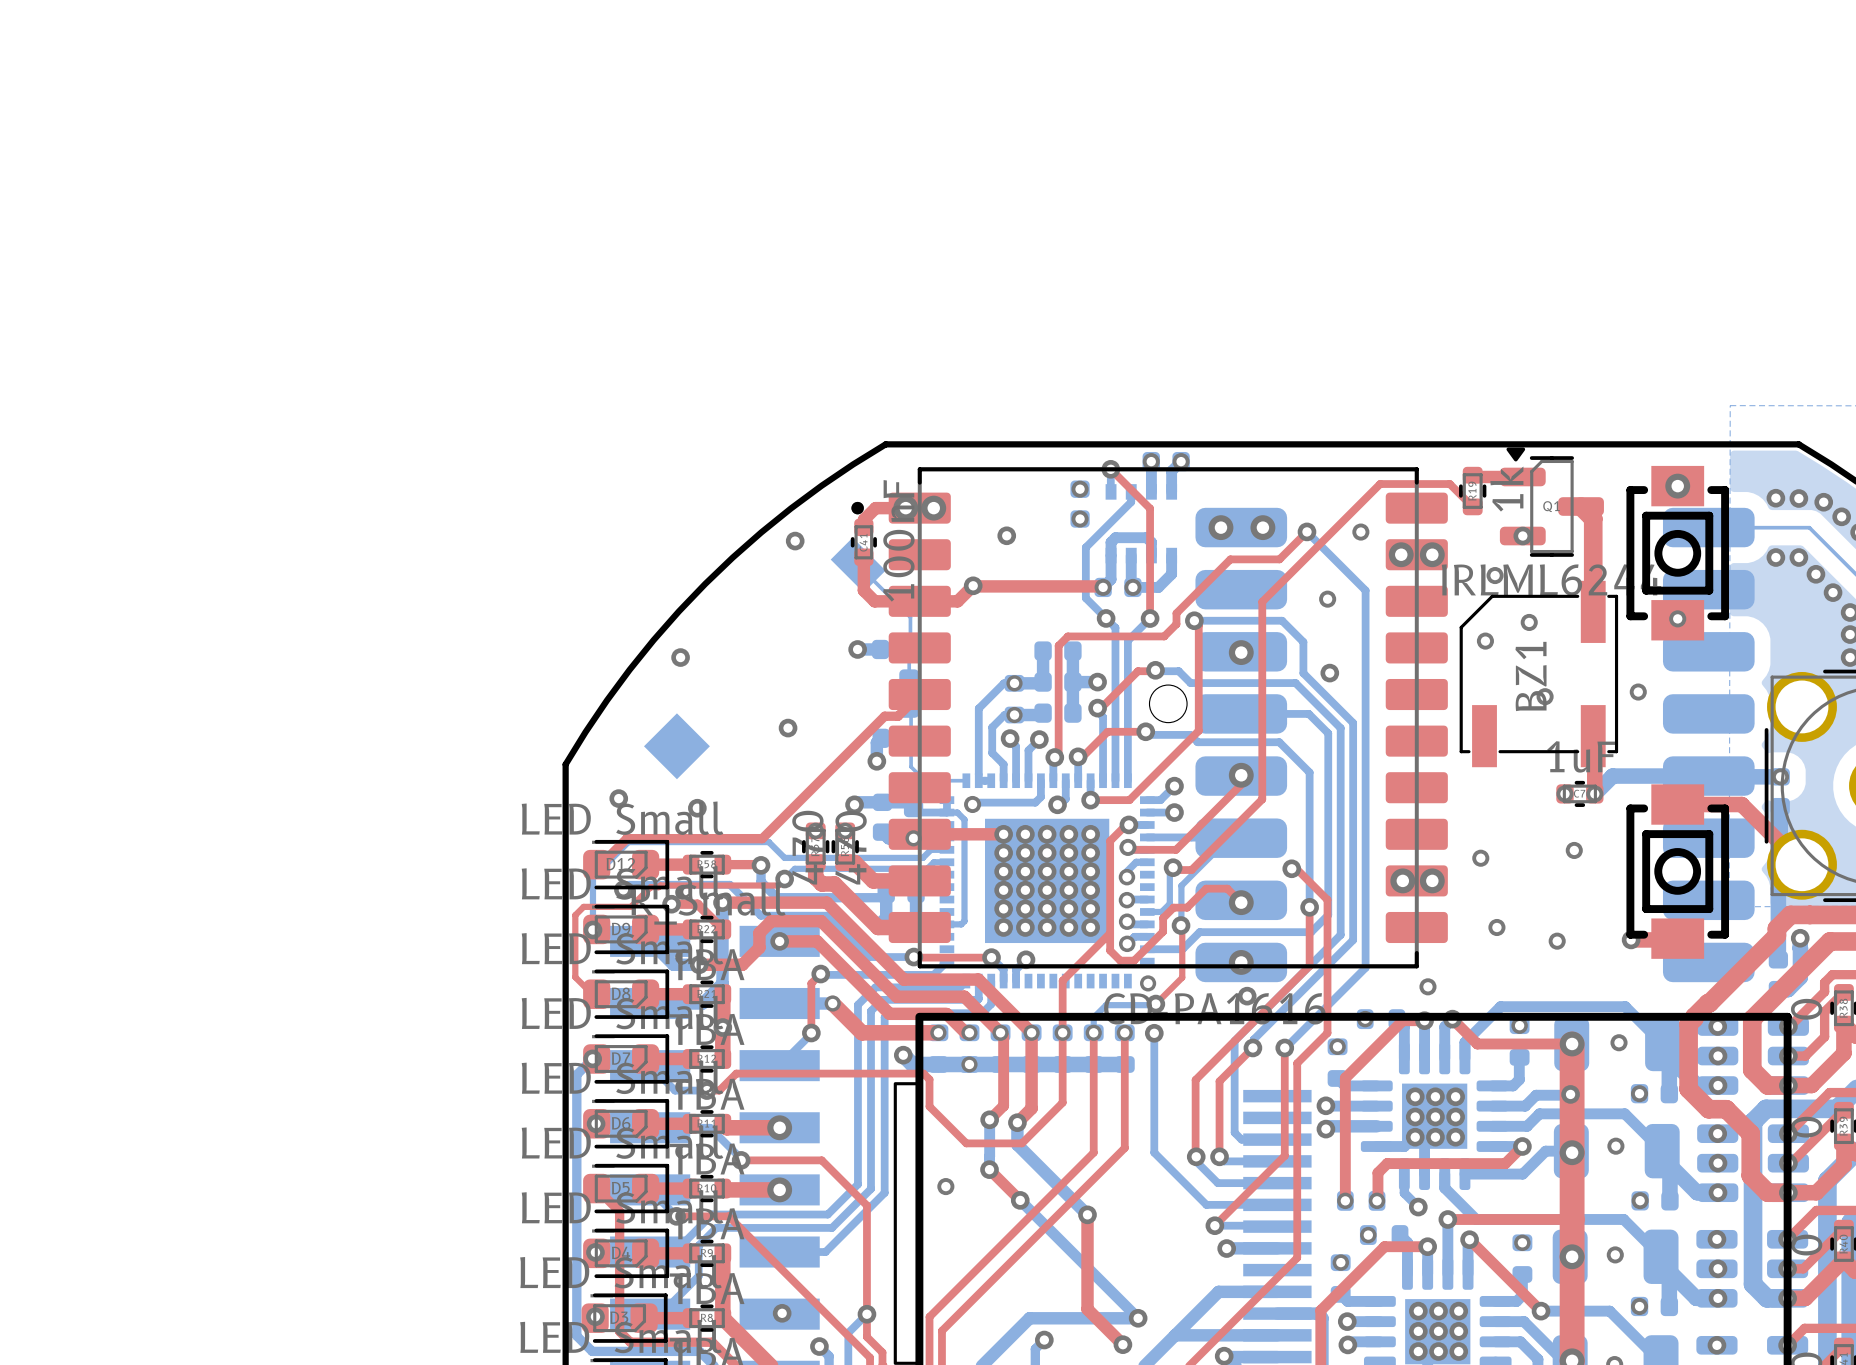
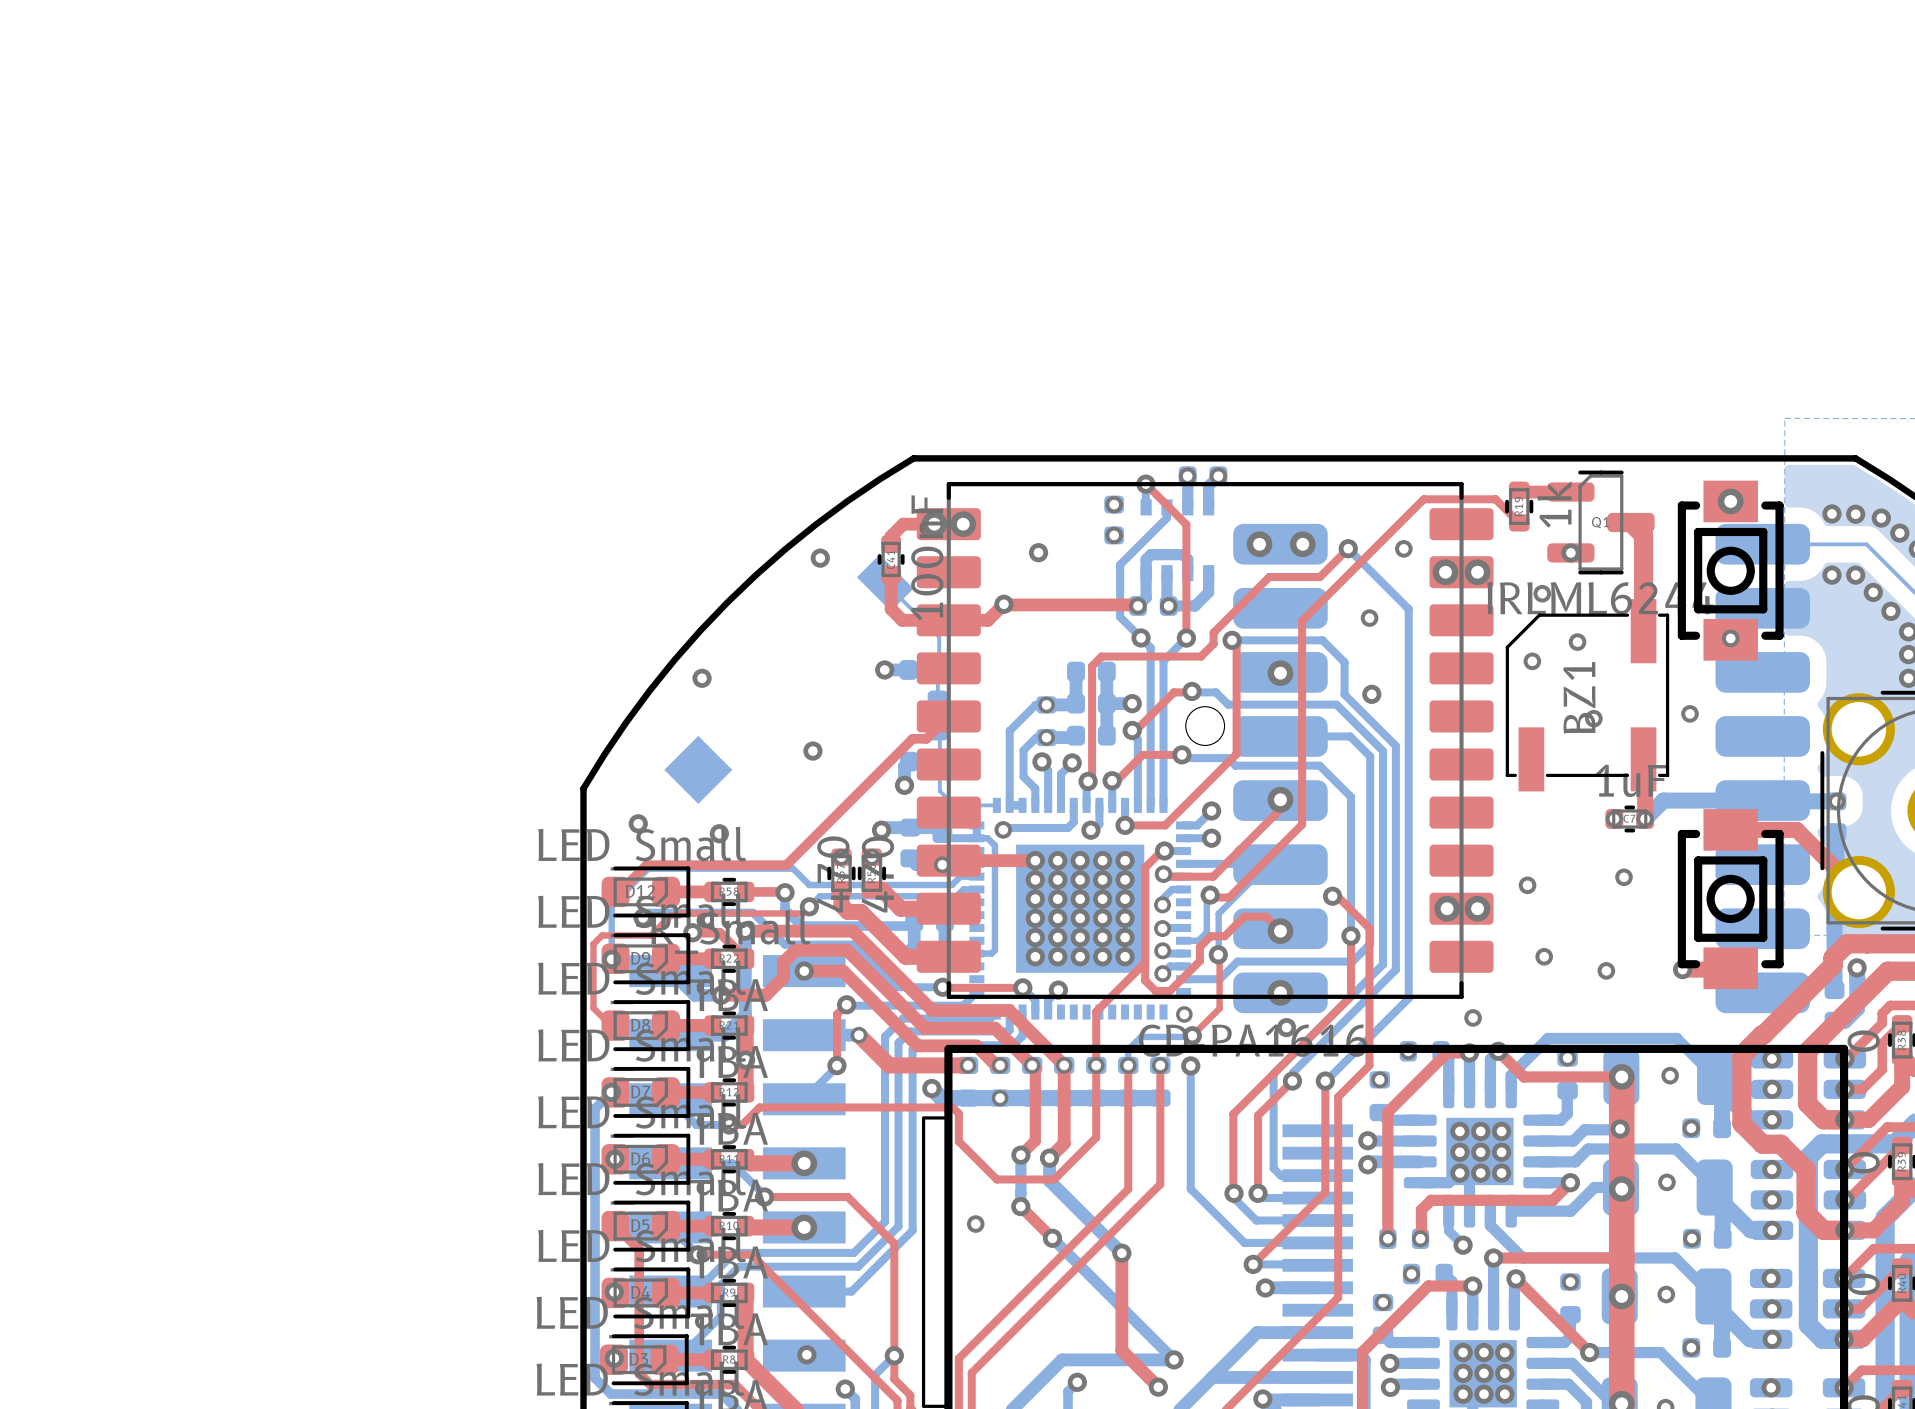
Q1 footprint: [1499, 447, 1604, 557] -> [1547, 470, 1655, 575]
part footprint: [851, 467, 1448, 969] -> [916, 482, 1494, 999]

